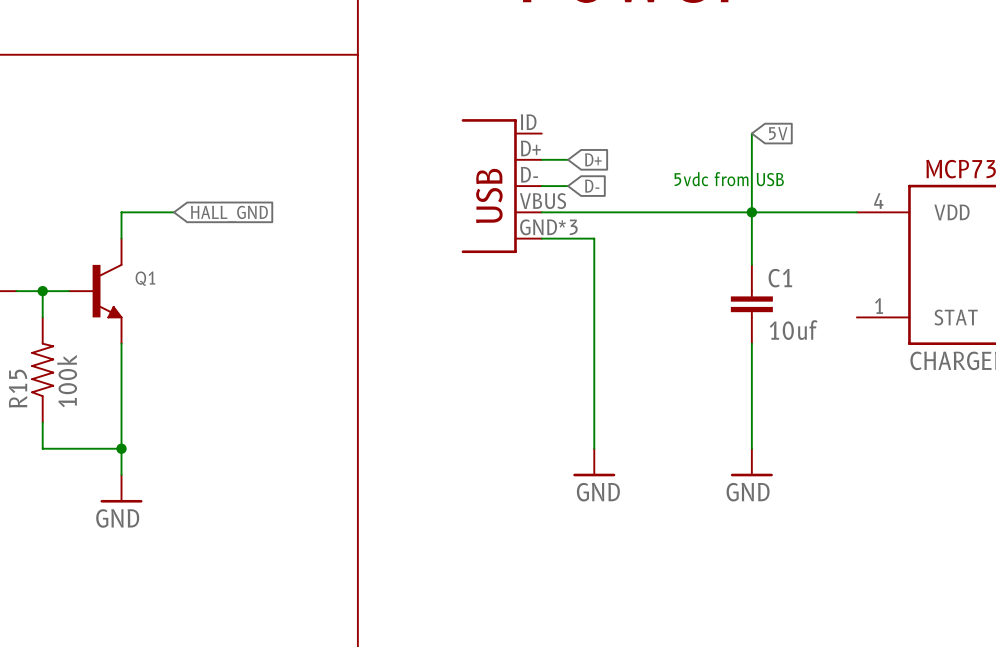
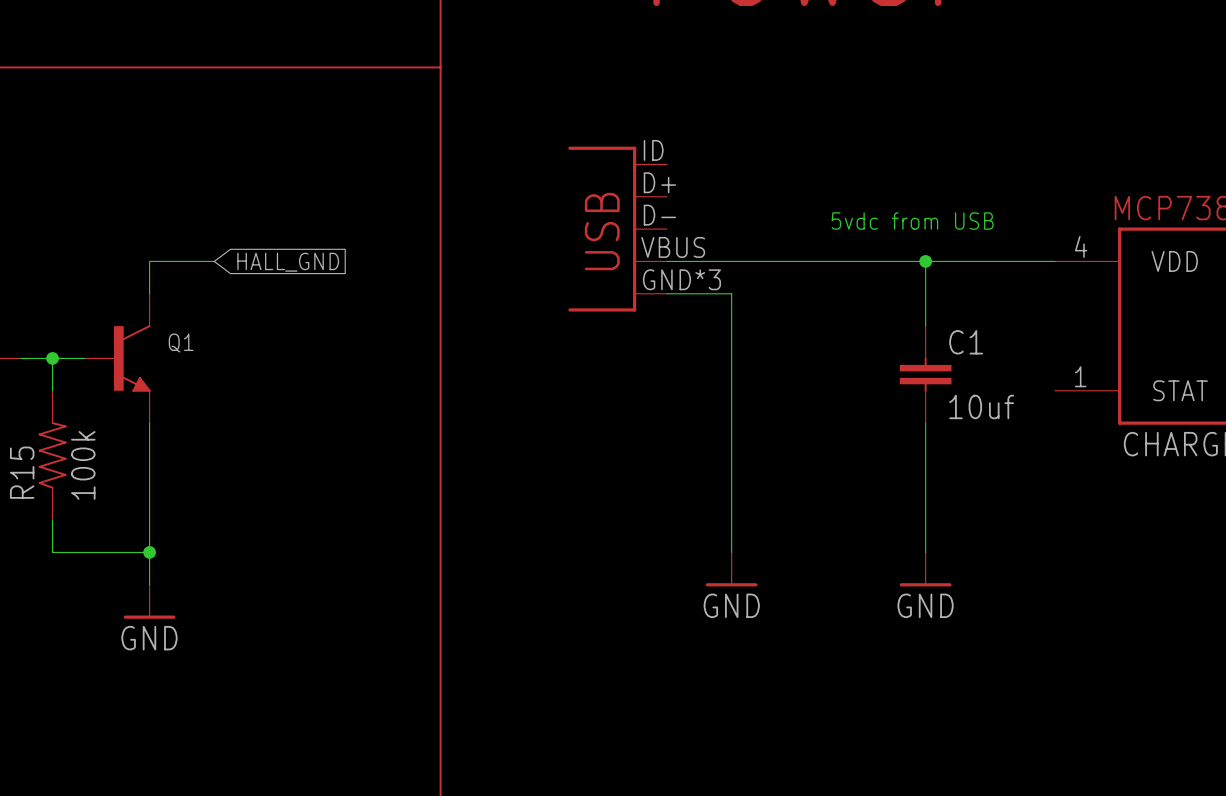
wire: (751, 133) (751, 212) -> none
global label: 5V (778, 133) -> none
wire: (541, 159) (568, 159) -> none
global label: D+ (593, 159) -> none
wire: (541, 186) (568, 186) -> none
global label: D- (592, 186) -> none

